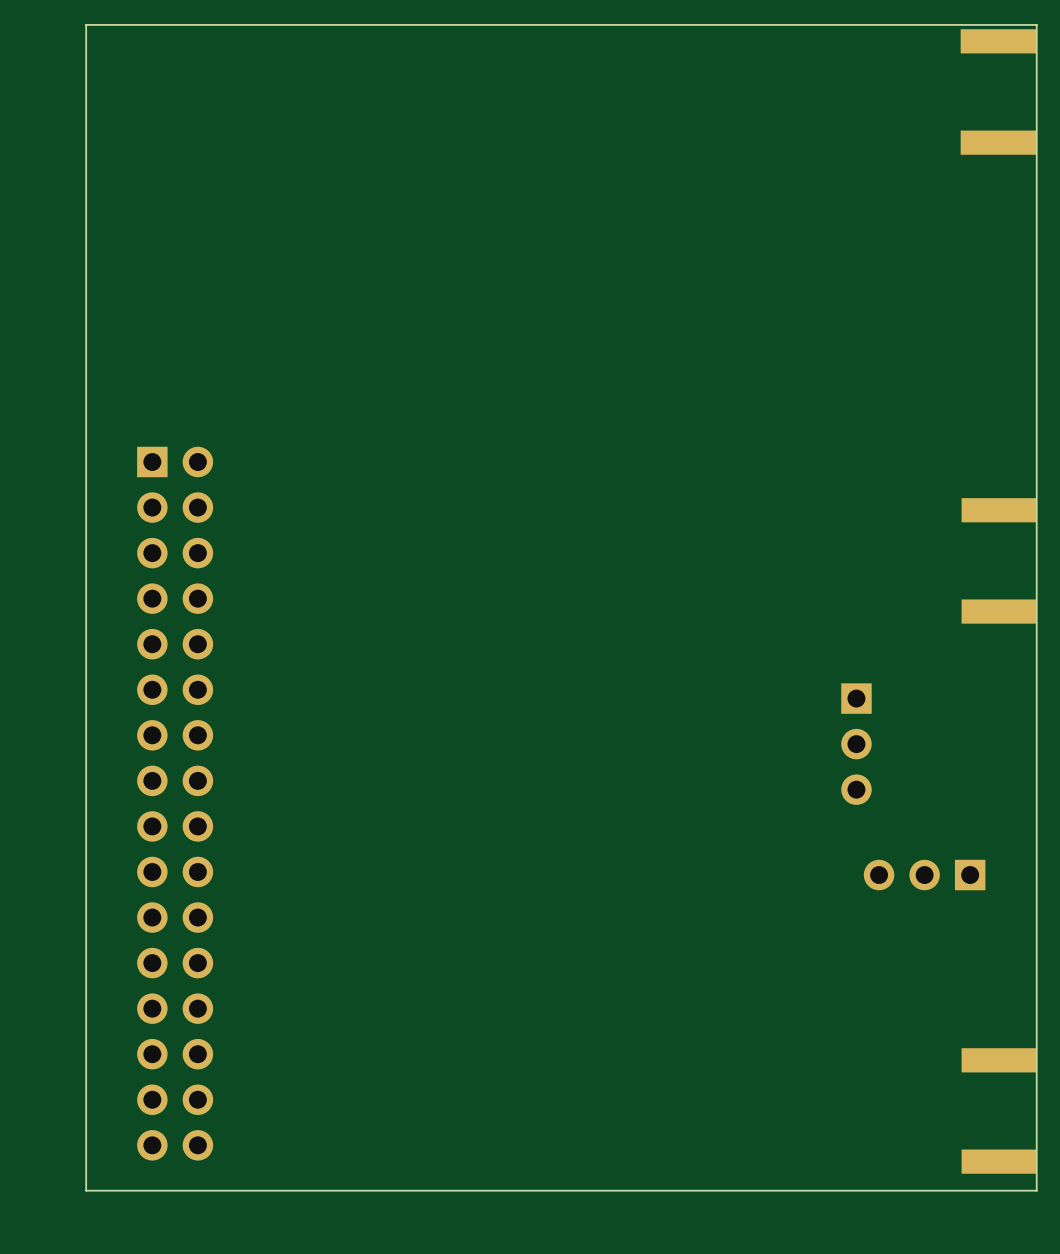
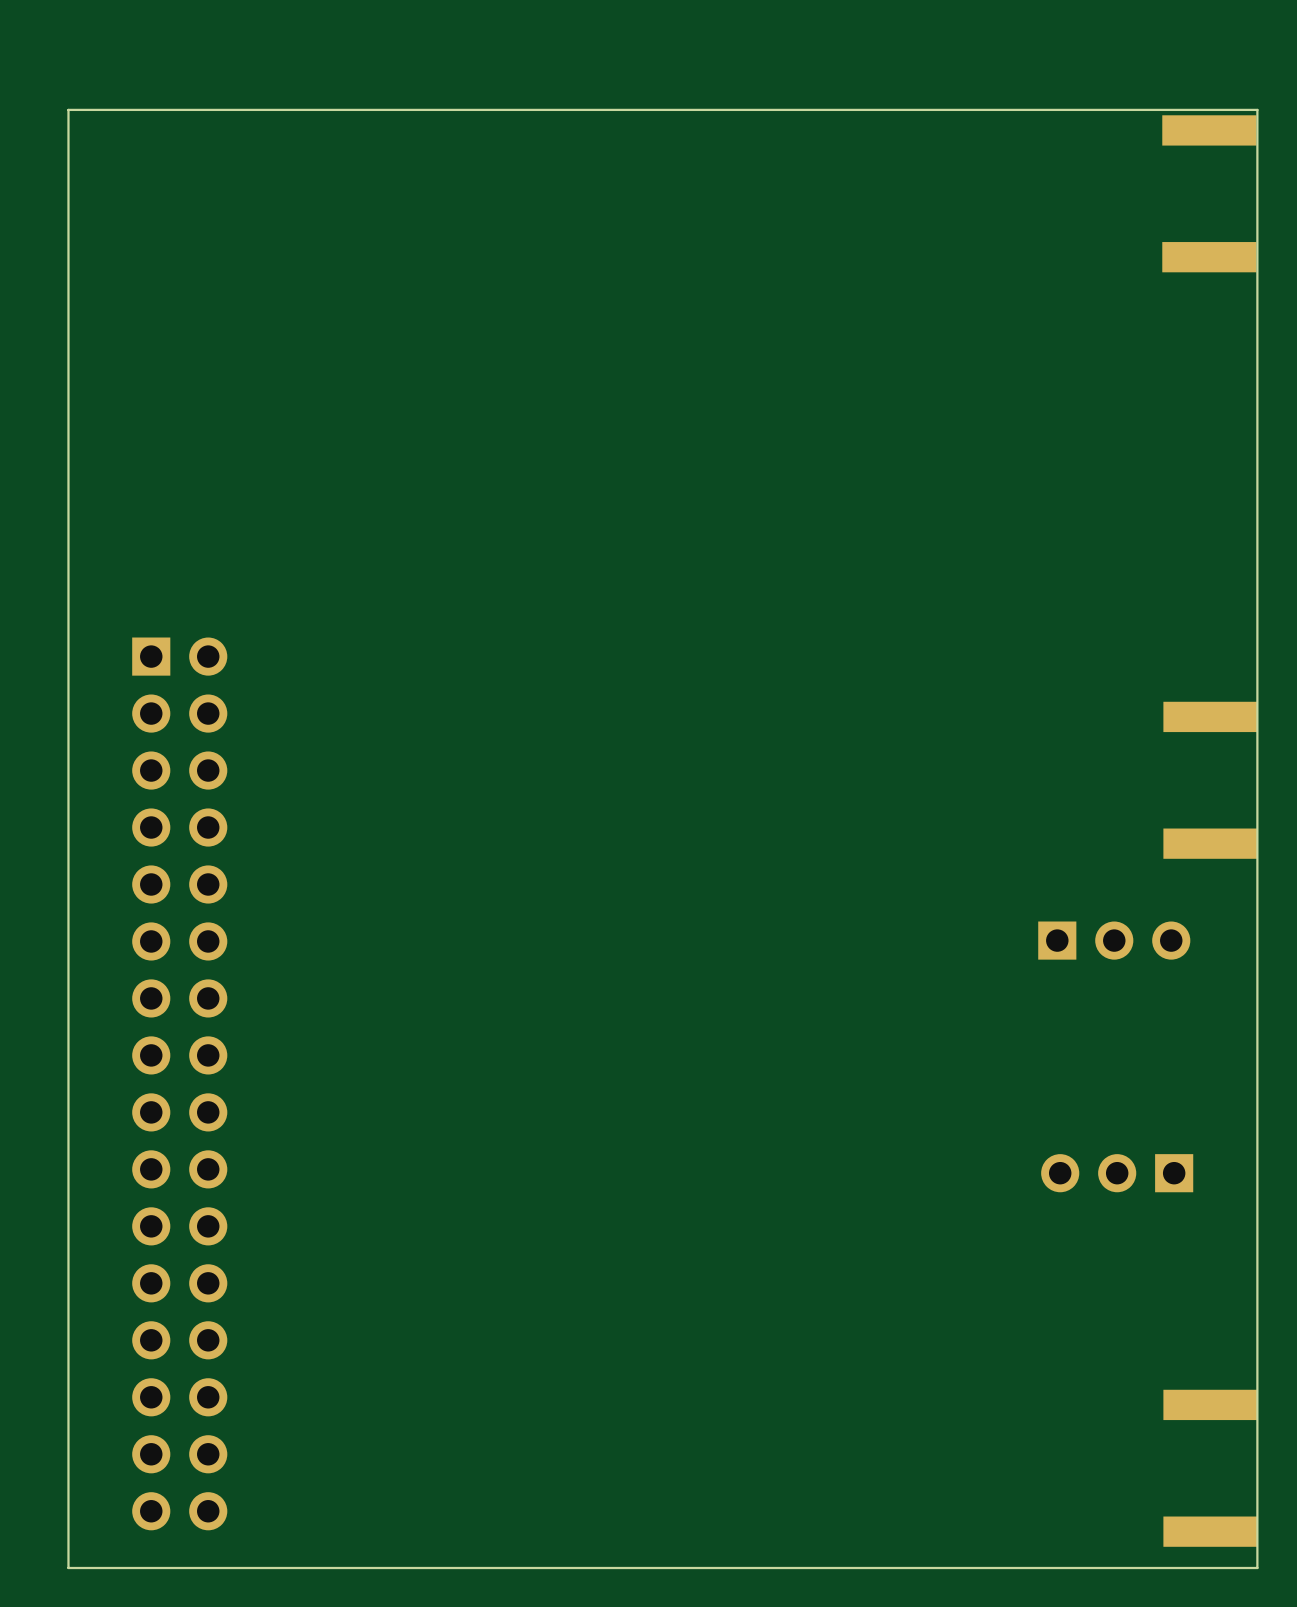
part rotation: 0° (856, 744) -> 90° counterclockwise (1114, 940)
part position: (856, 744) -> (1114, 940)

